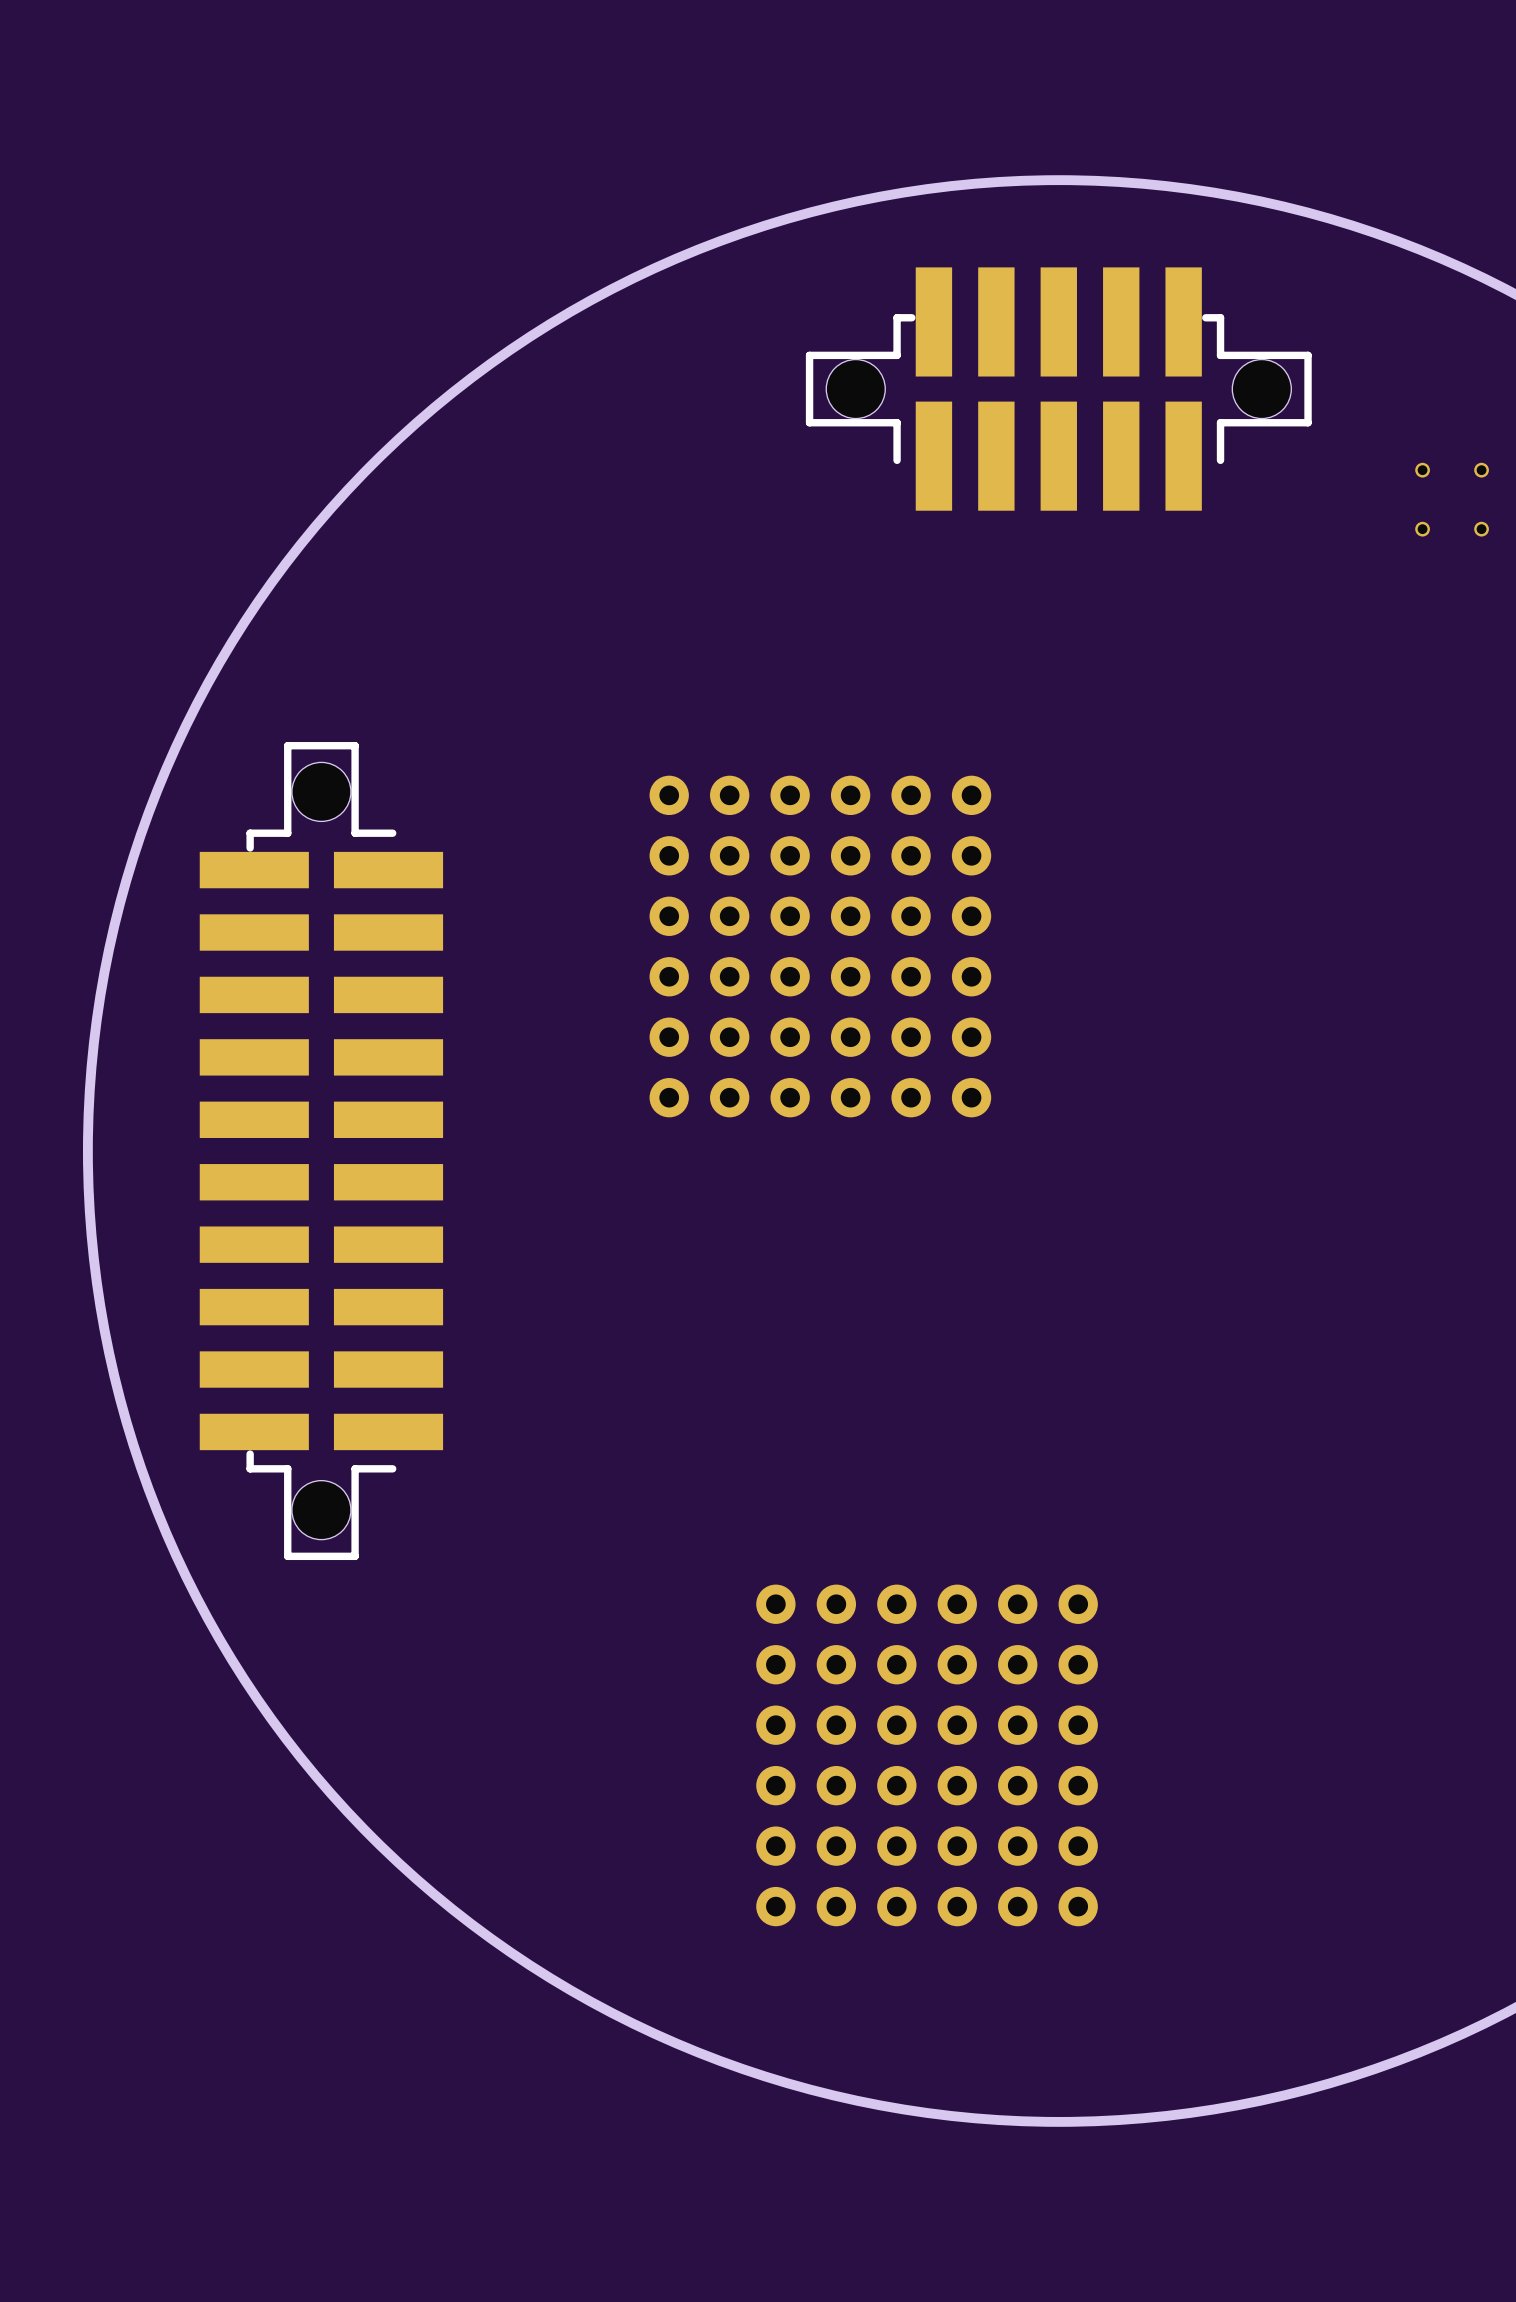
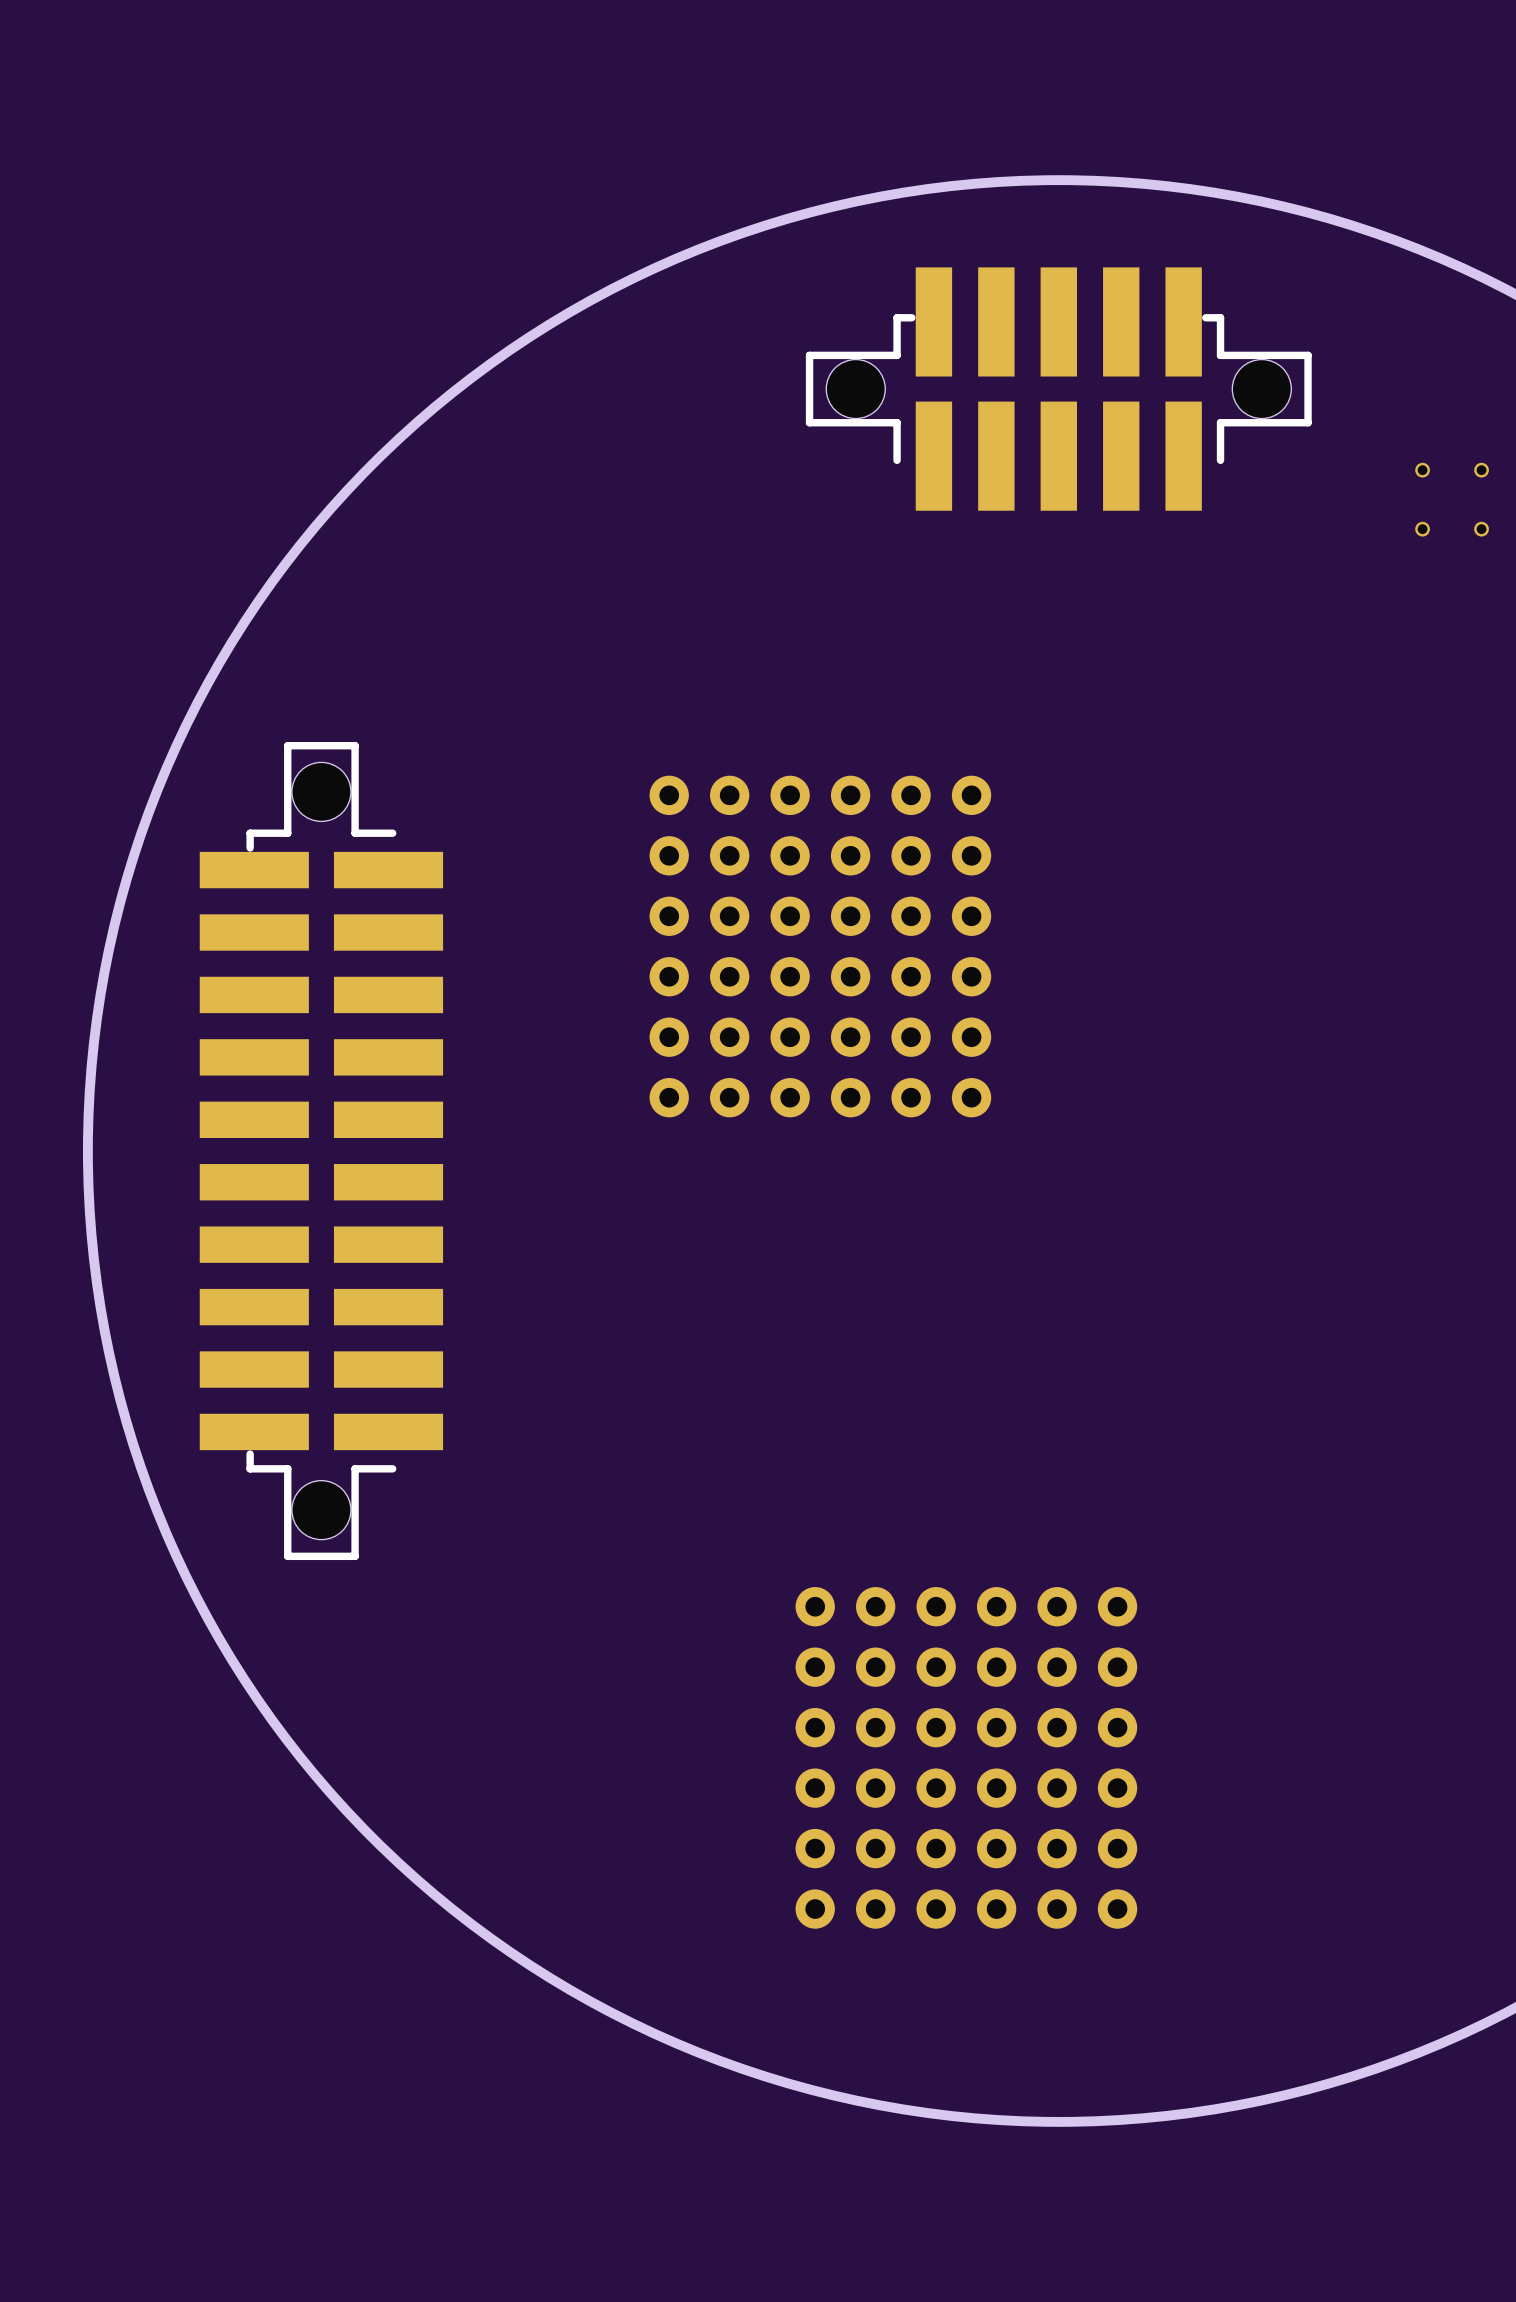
part position: (927, 1755) -> (966, 1757)

